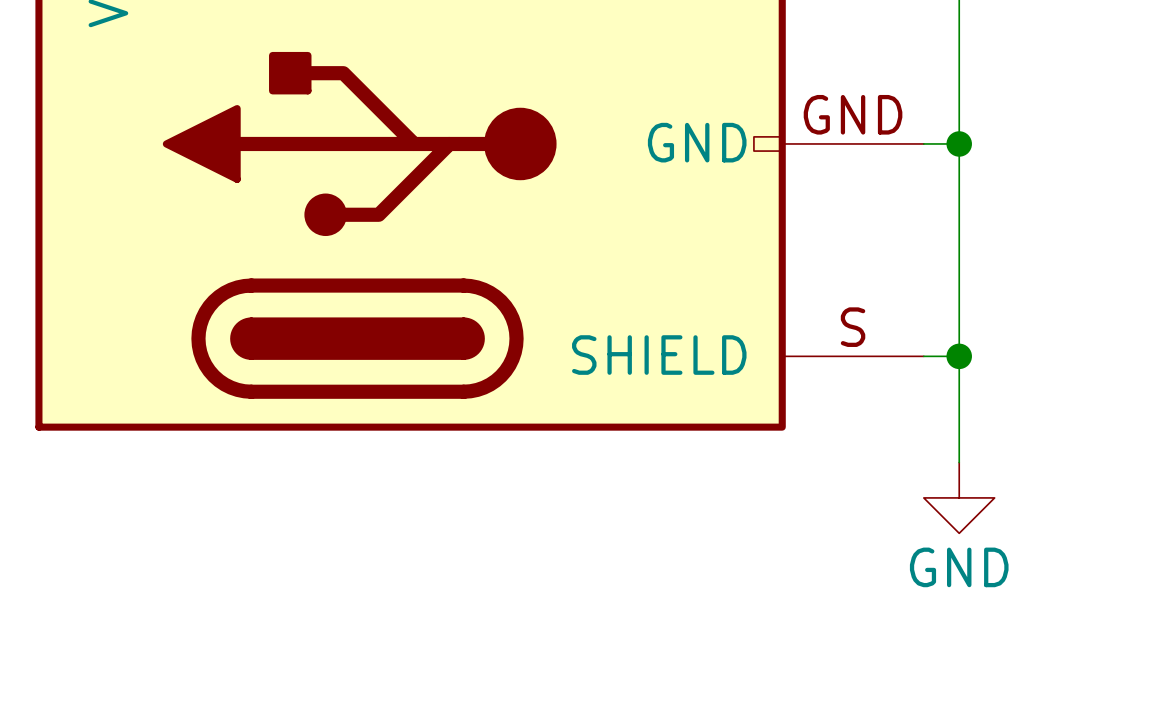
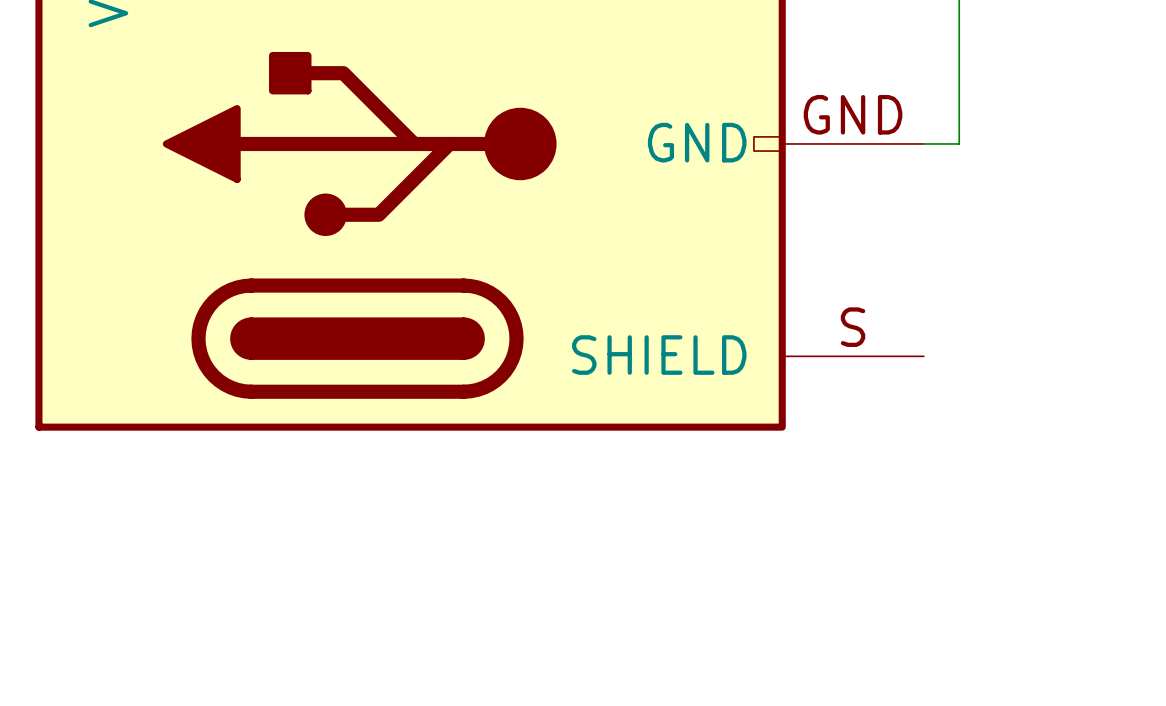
wire: (959, 143) (959, 462) -> none
junction: (959, 143) -> none
wire: (923, 356) (959, 356) -> none
junction: (959, 356) -> none
power symbol: GND (959, 497) -> none

